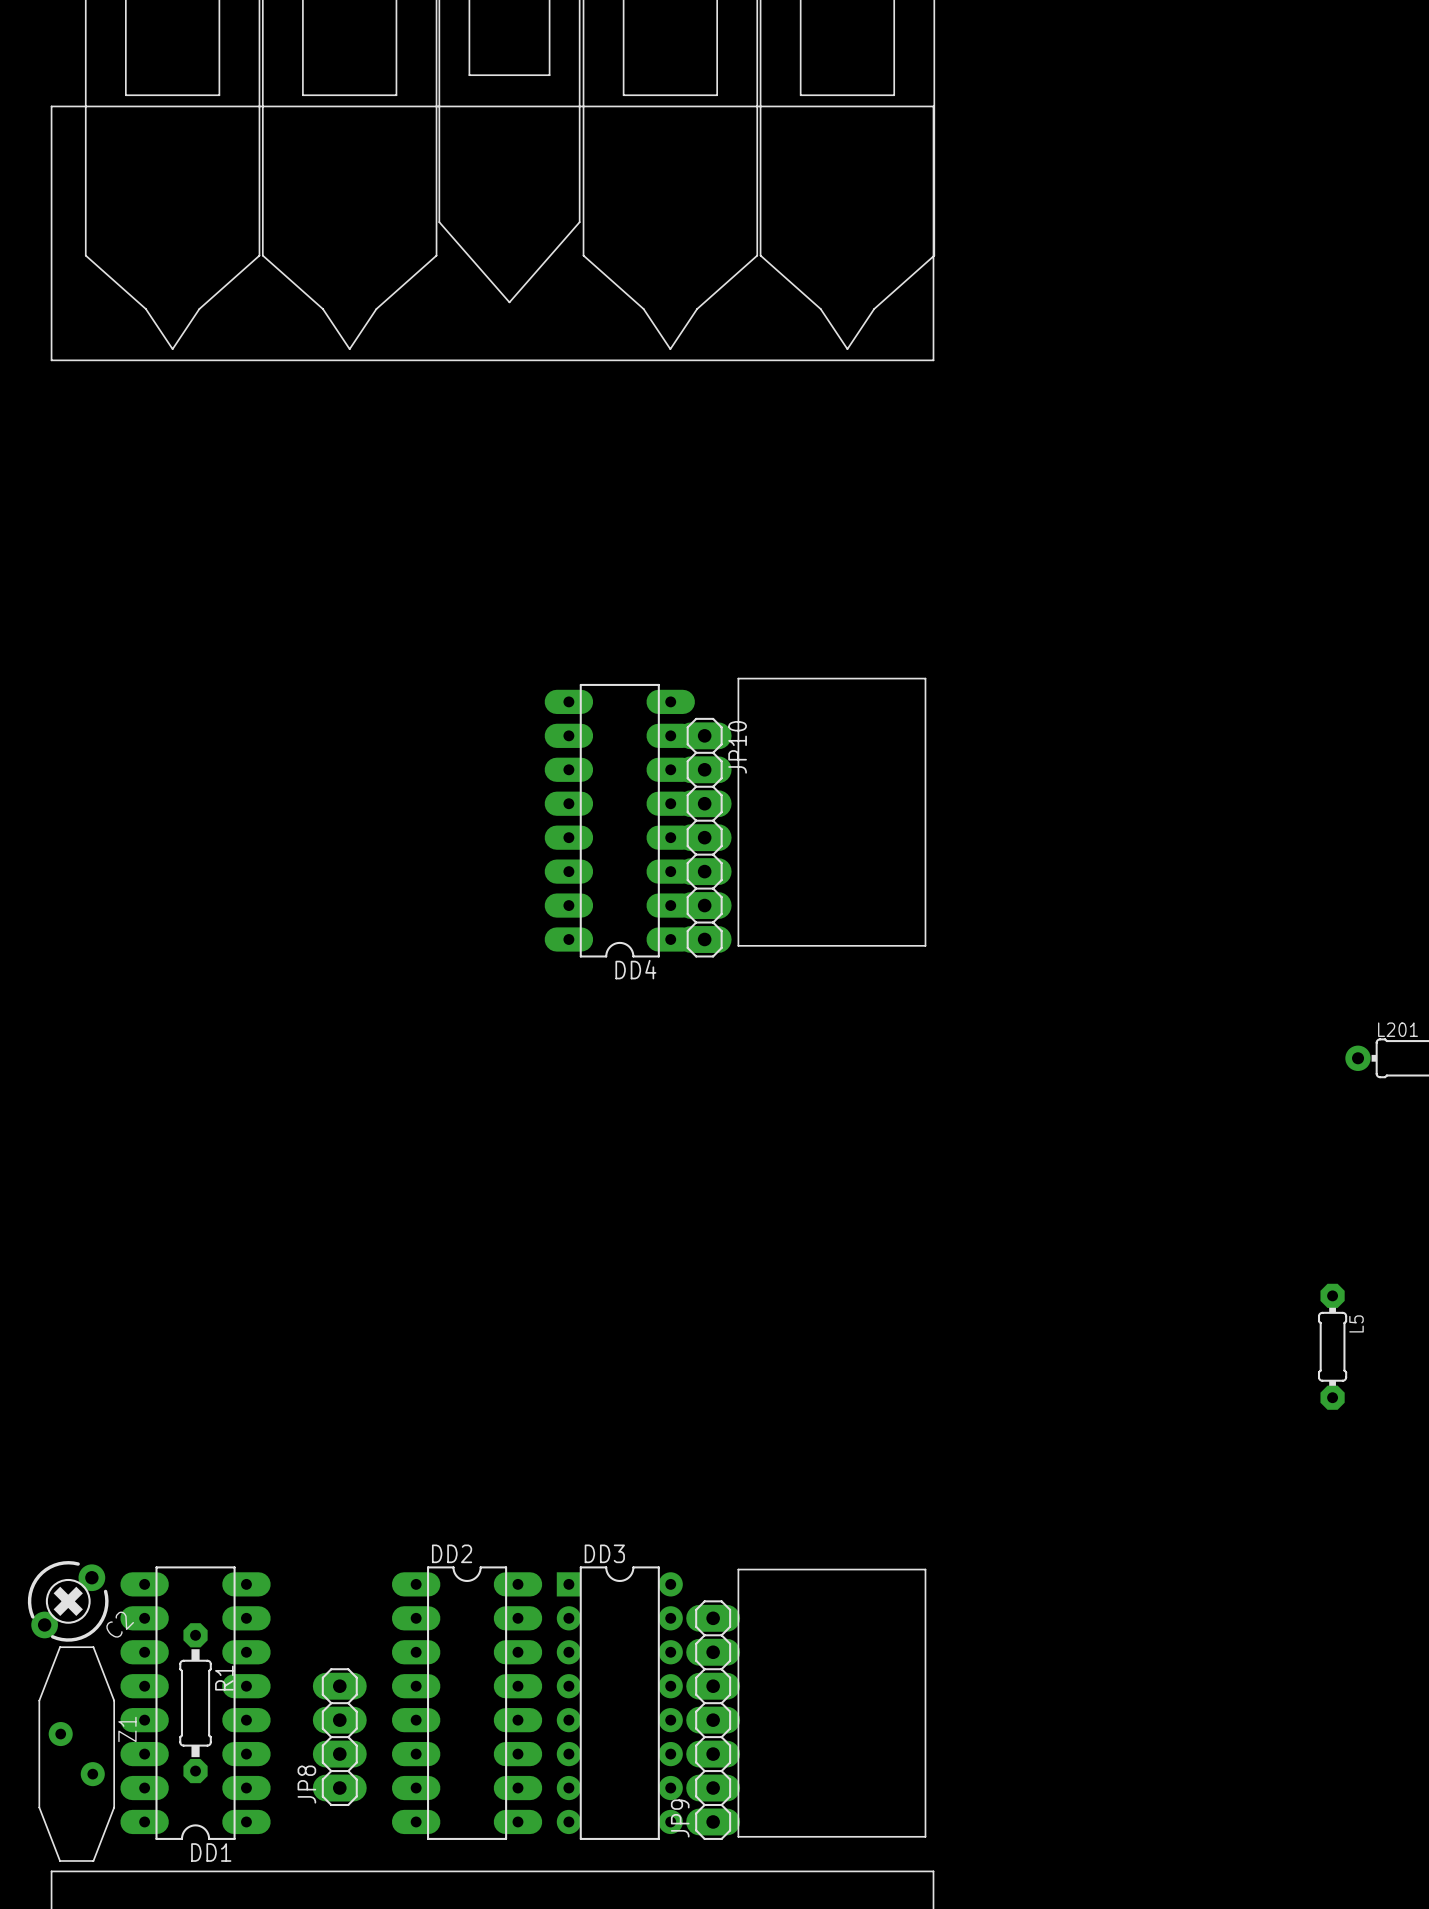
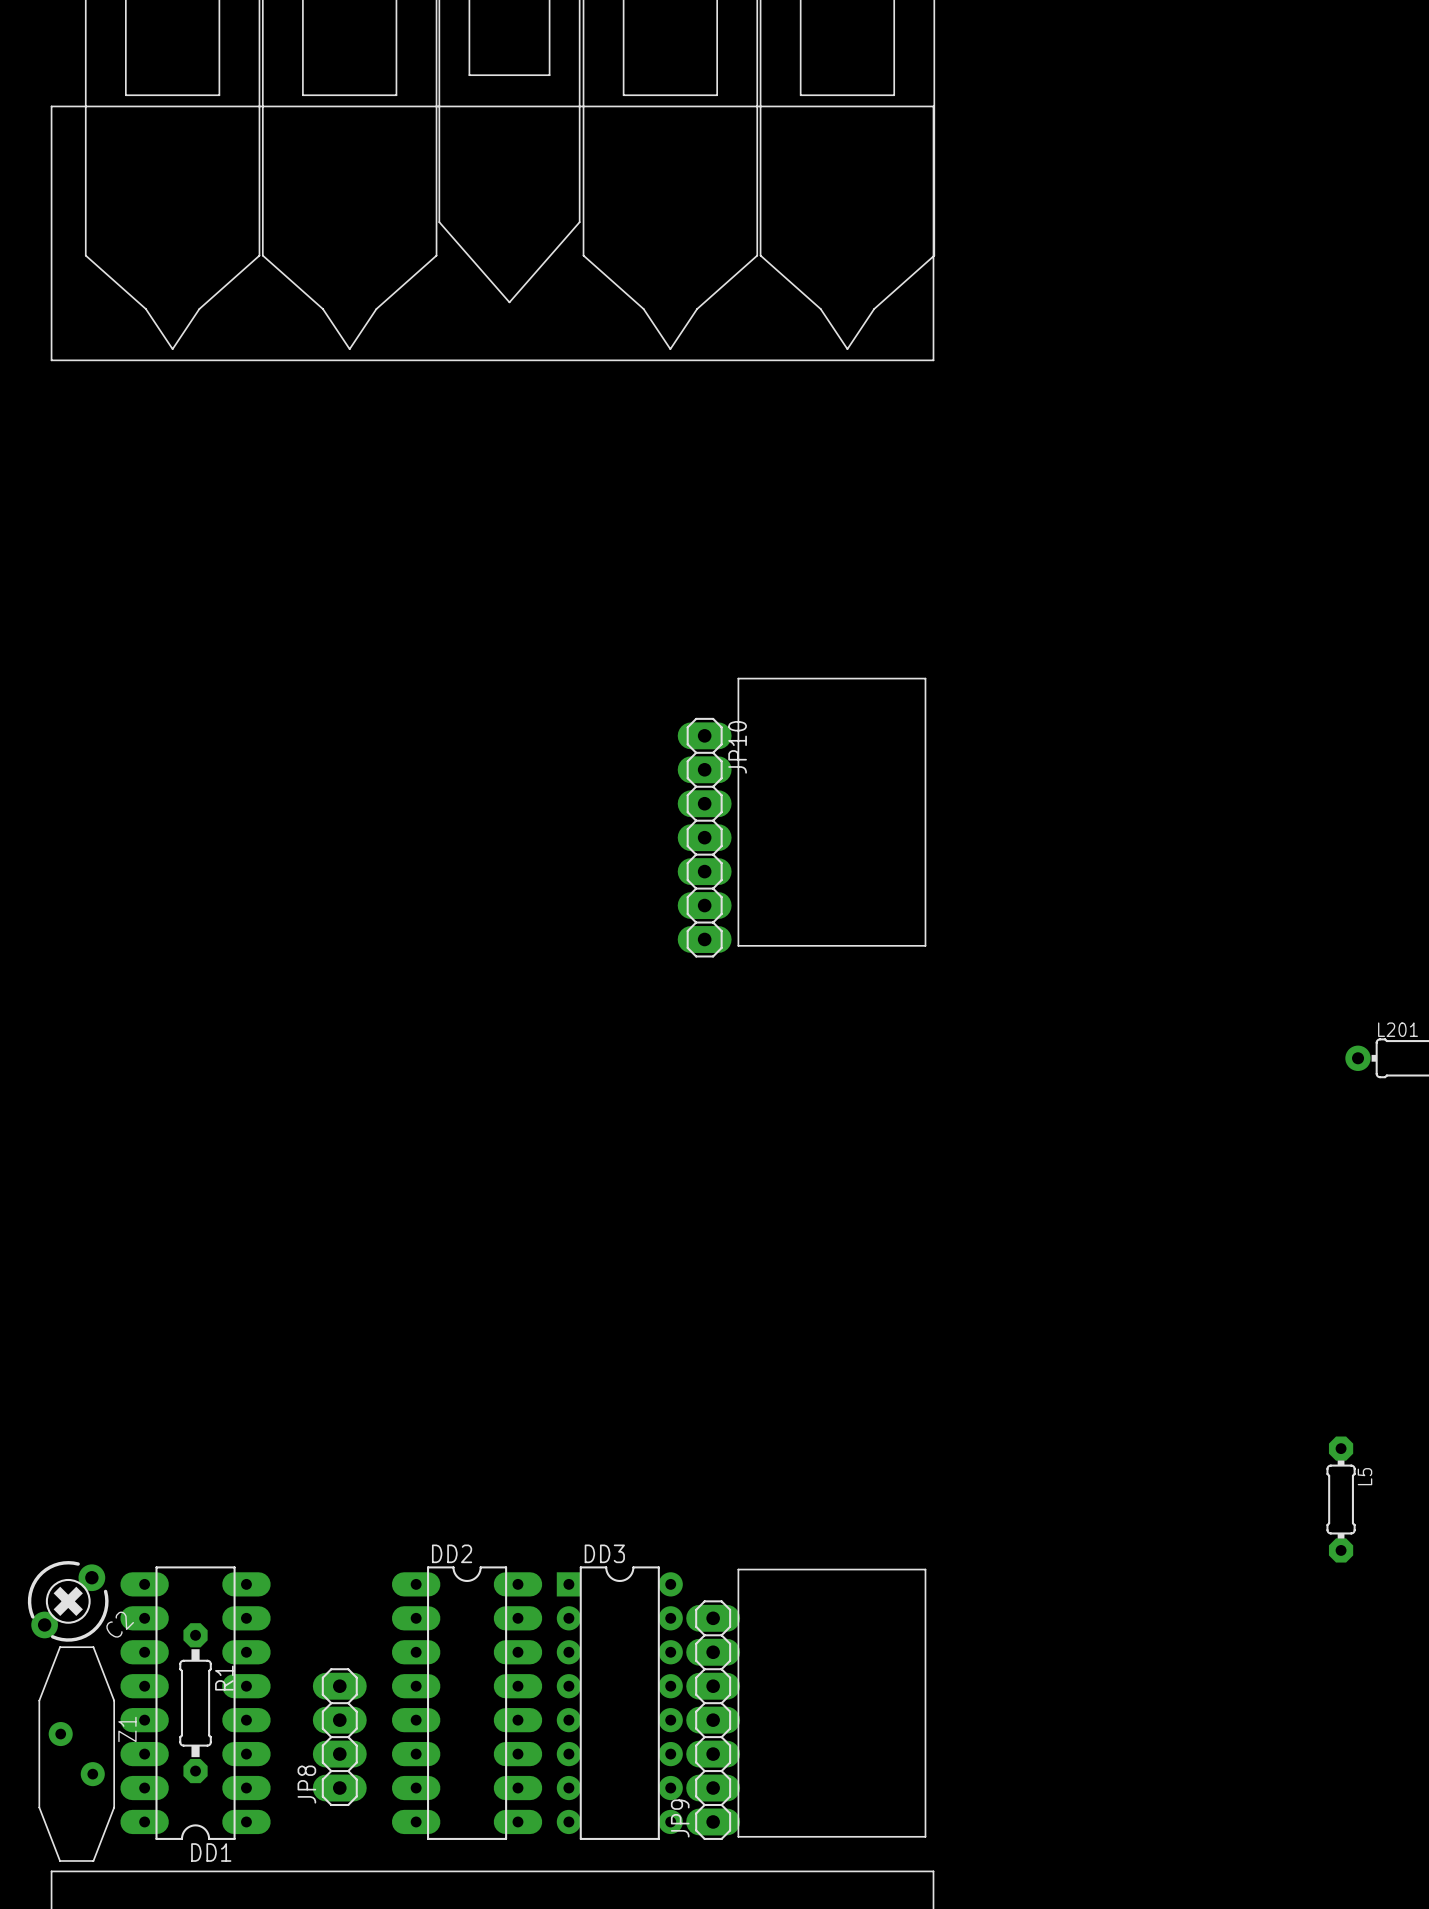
DD4: (619, 820) -> none
L5 position: (1332, 1346) -> (1341, 1499)

